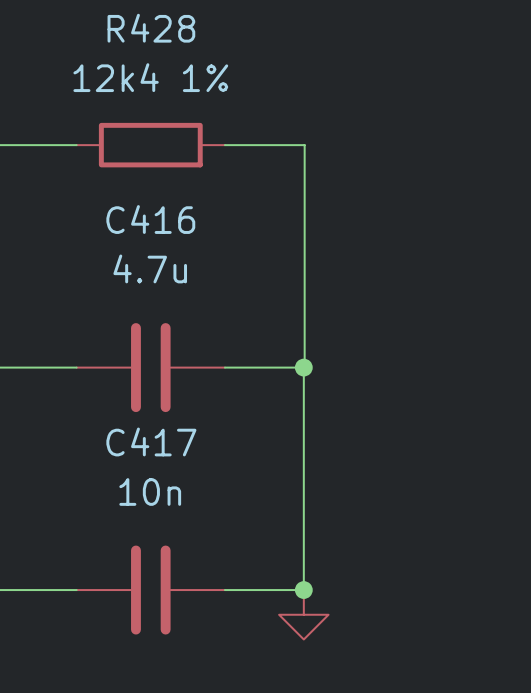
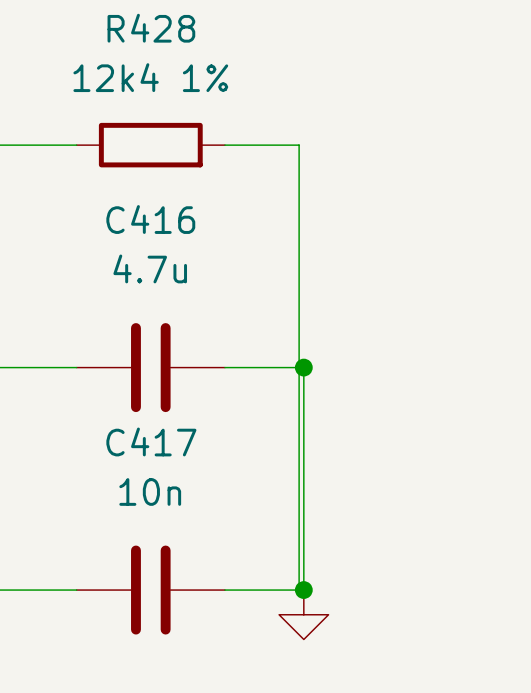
wire: (299, 145) (304, 145) (304, 367) (299, 367) -> (299, 145) (299, 590)

